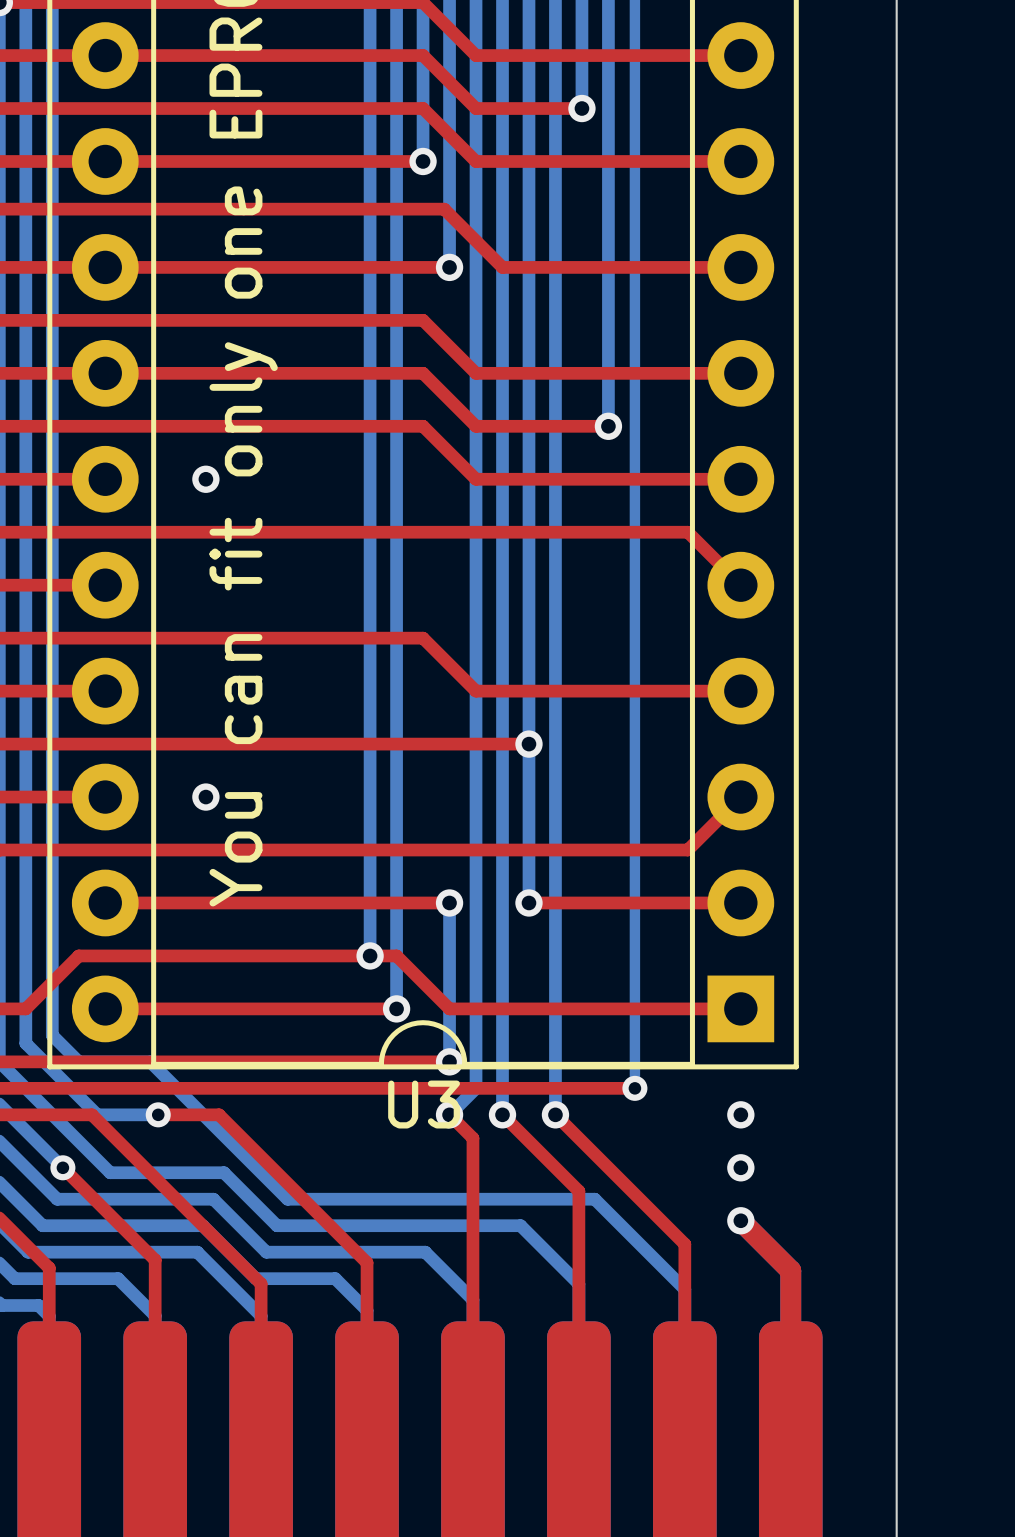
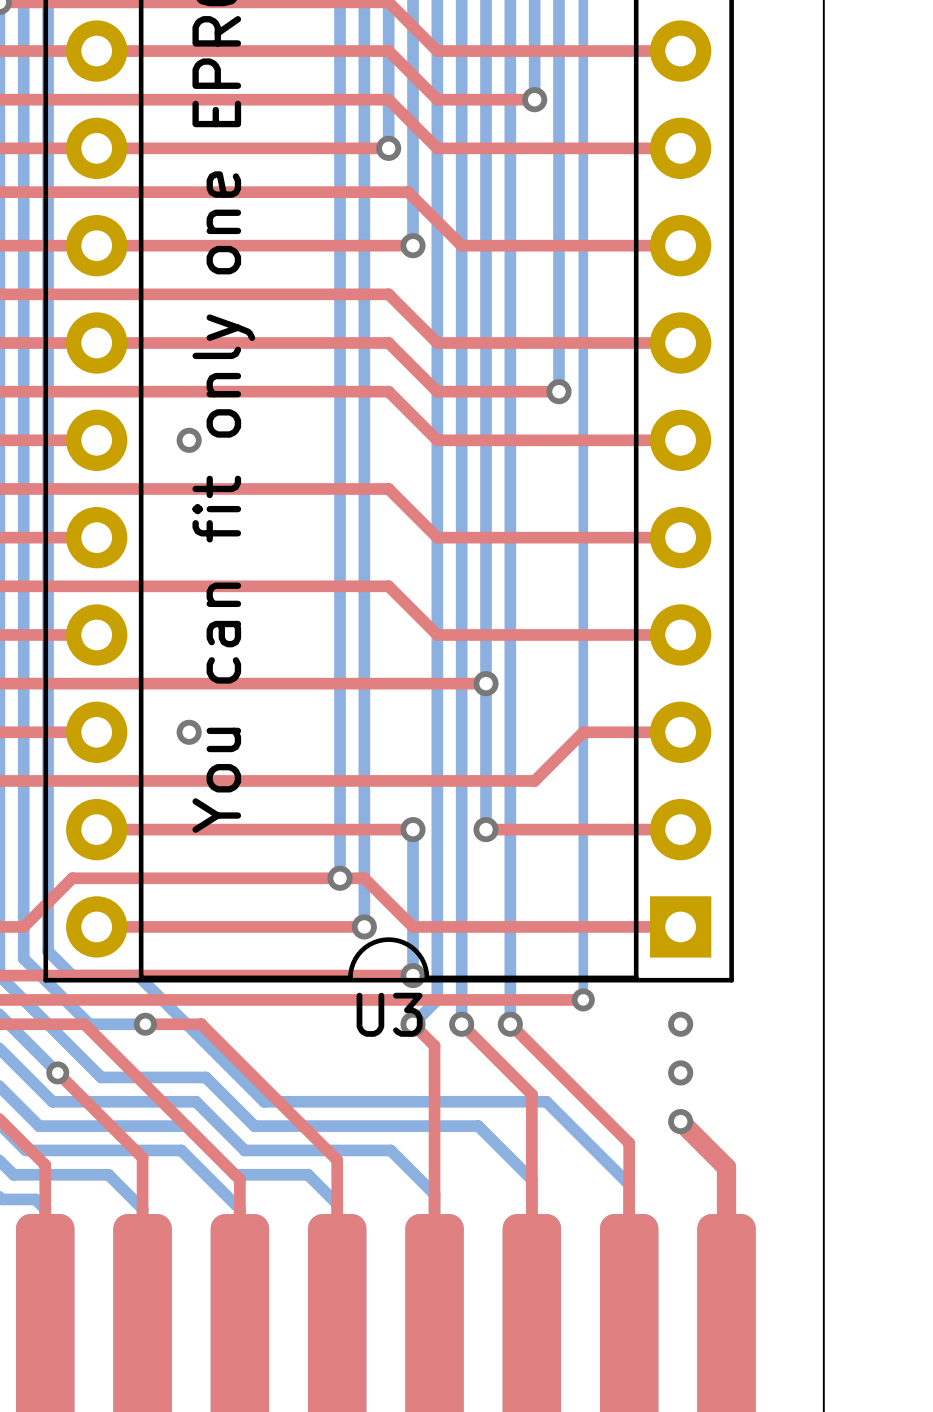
top track: (423, 532) (687, 532) (740, 585) -> (388, 488) (437, 537) (680, 537)
top track: (740, 797) (687, 850) (581, 850) -> (680, 732) (583, 732) (534, 780)

